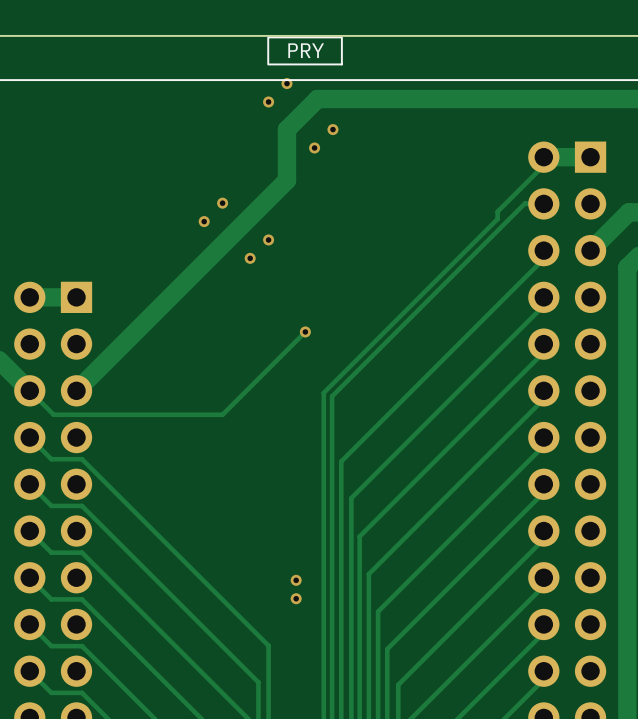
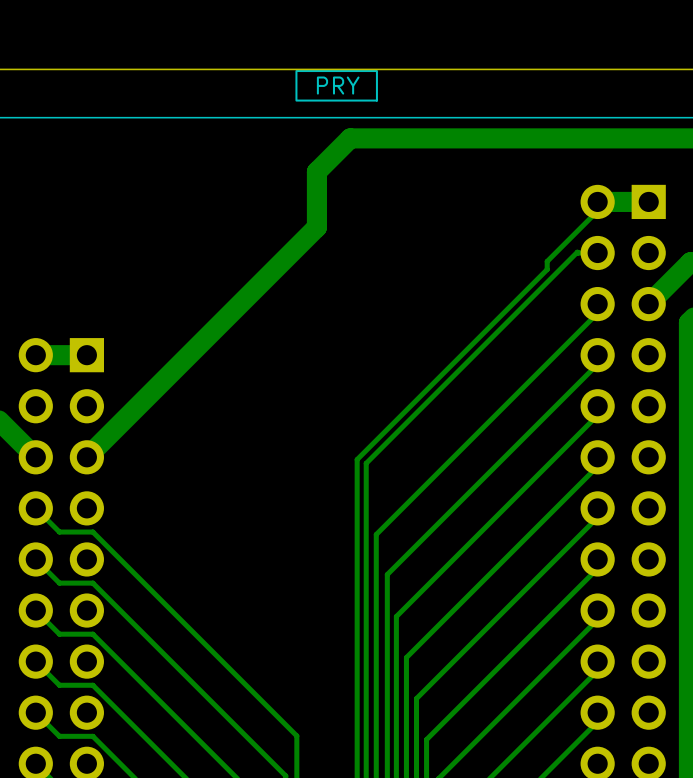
via: (286, 83) -> none
via: (268, 101) -> none
via: (332, 129) -> none
via: (314, 147) -> none
via: (222, 203) -> none
via: (204, 221) -> none
via: (268, 239) -> none
via: (250, 258) -> none
track: (305, 331) (222, 414) (53, 414) (29, 390) -> none
via: (305, 331) -> none
via: (296, 580) -> none
via: (296, 598) -> none

